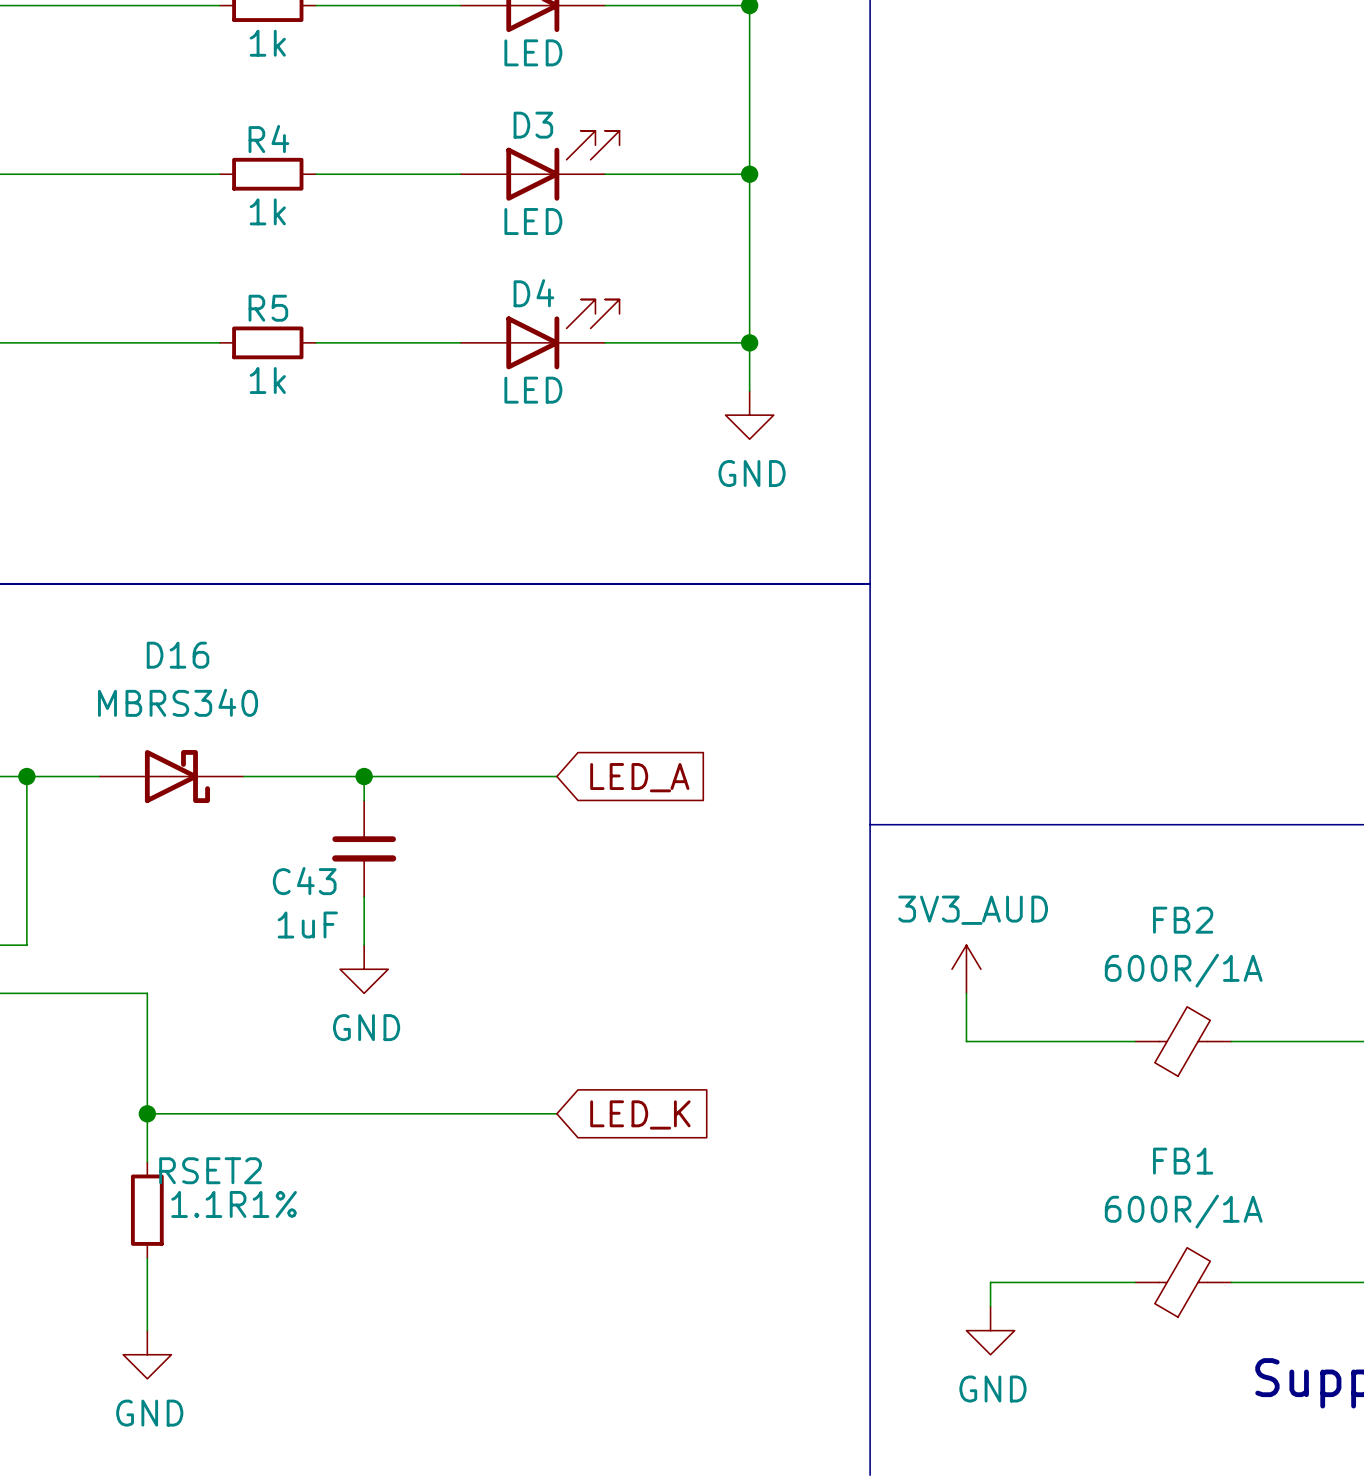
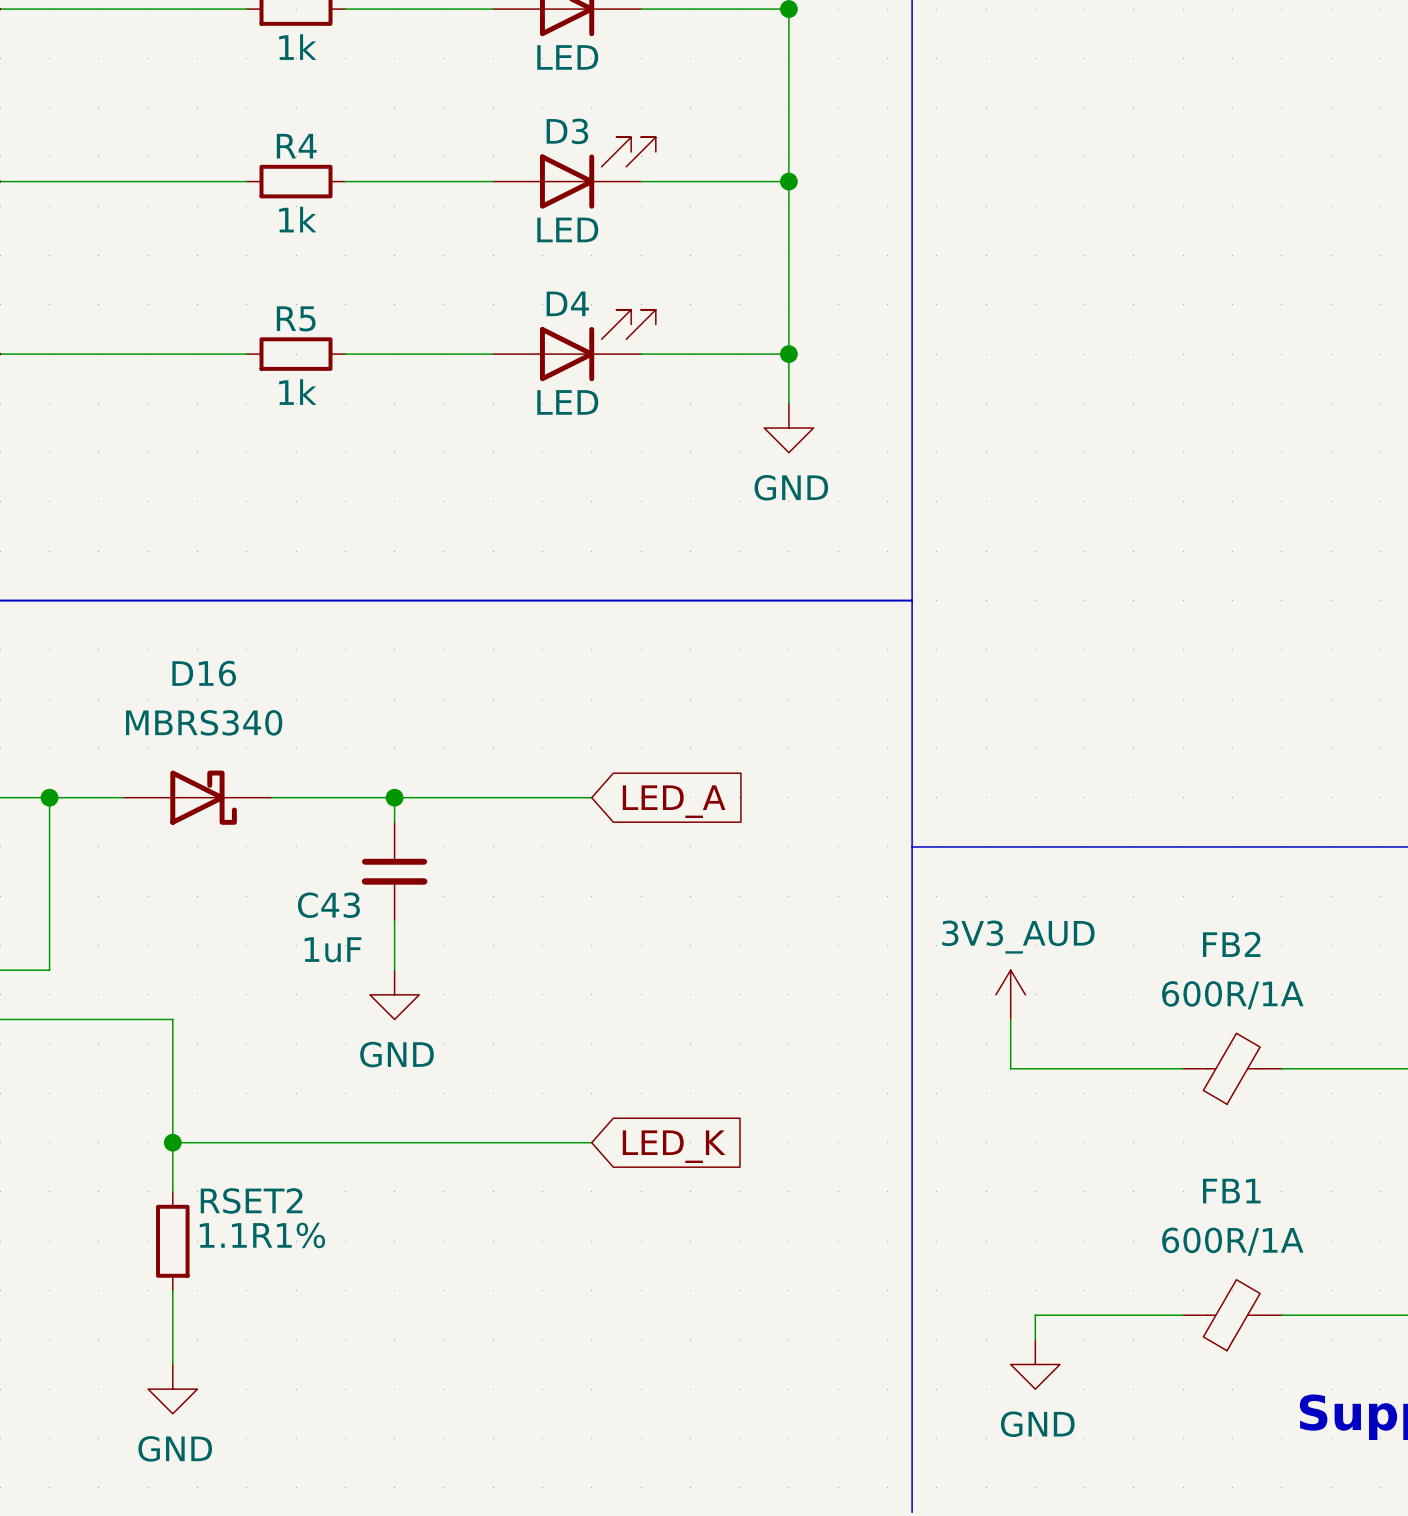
RSET2 name position: RSET2 (210, 1170) -> RSET2 (251, 1200)

